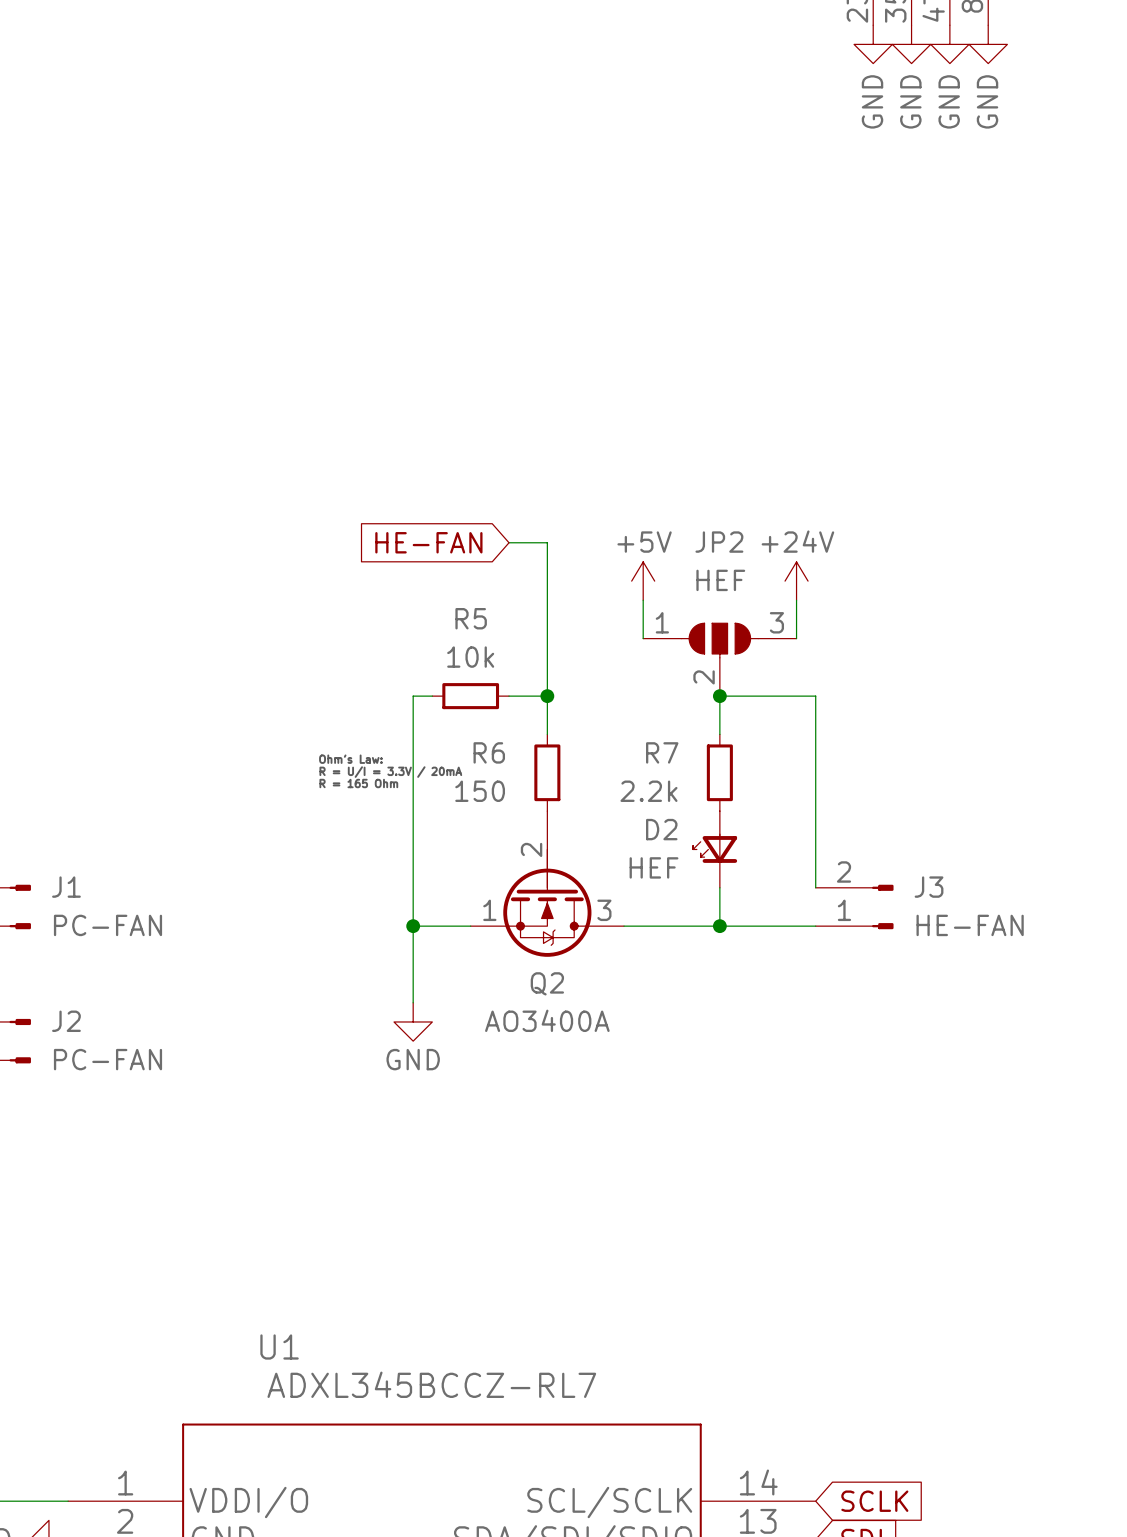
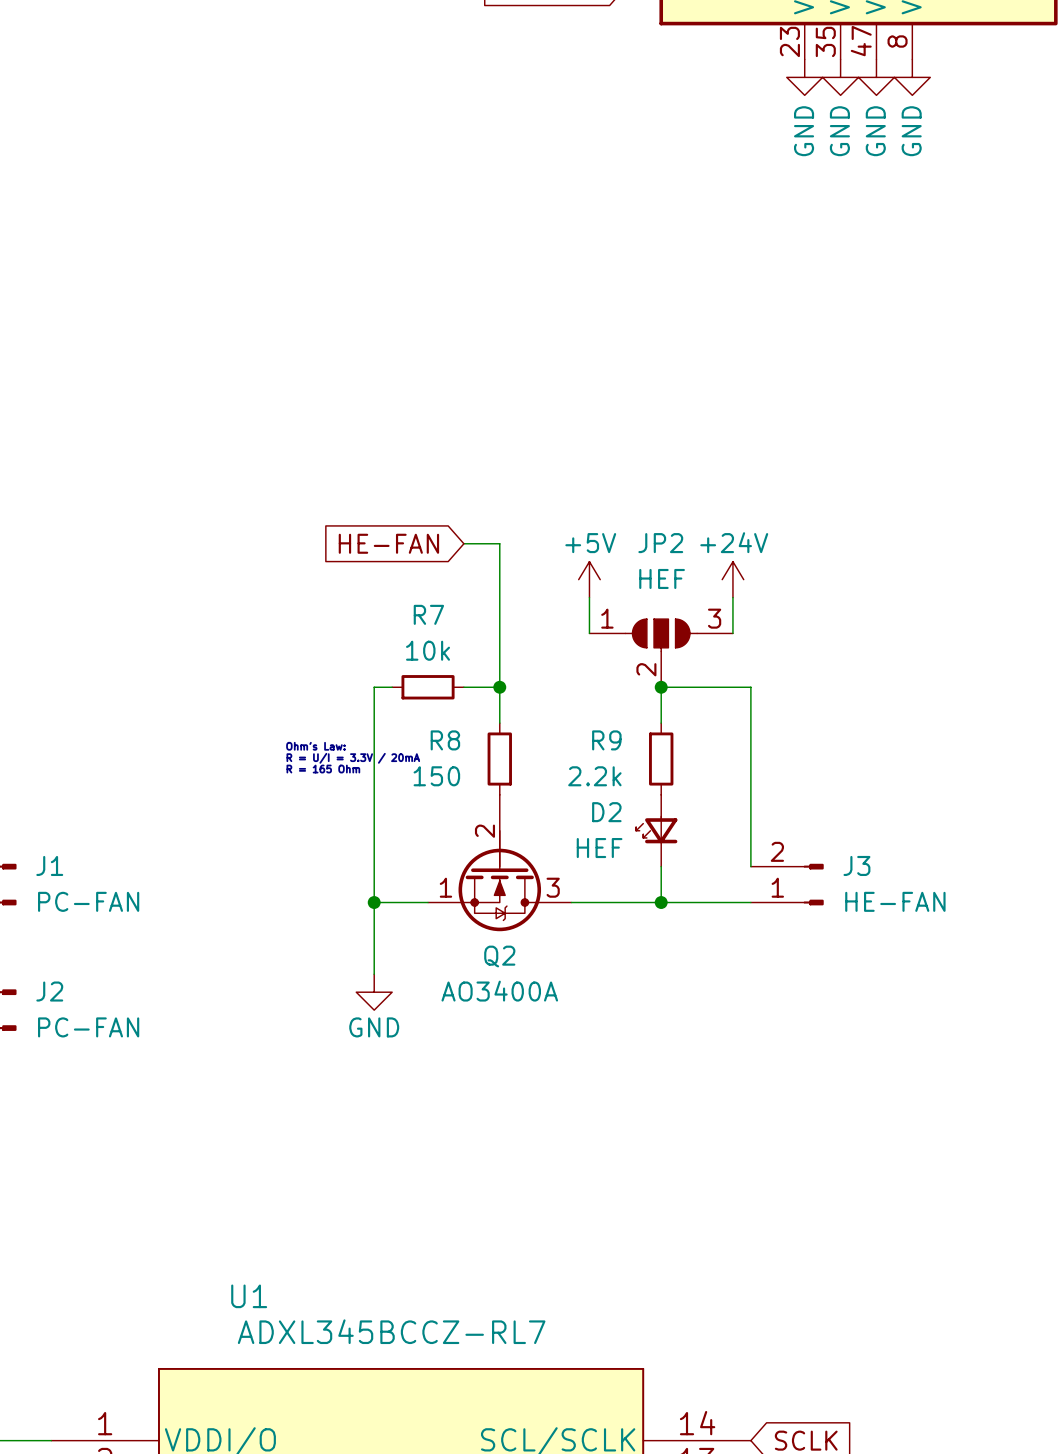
R5 name: R5 (471, 618) -> R7 (428, 614)
R6 name: R6 (489, 752) -> R8 (445, 740)
R7 name: R7 (662, 752) -> R9 (606, 740)

